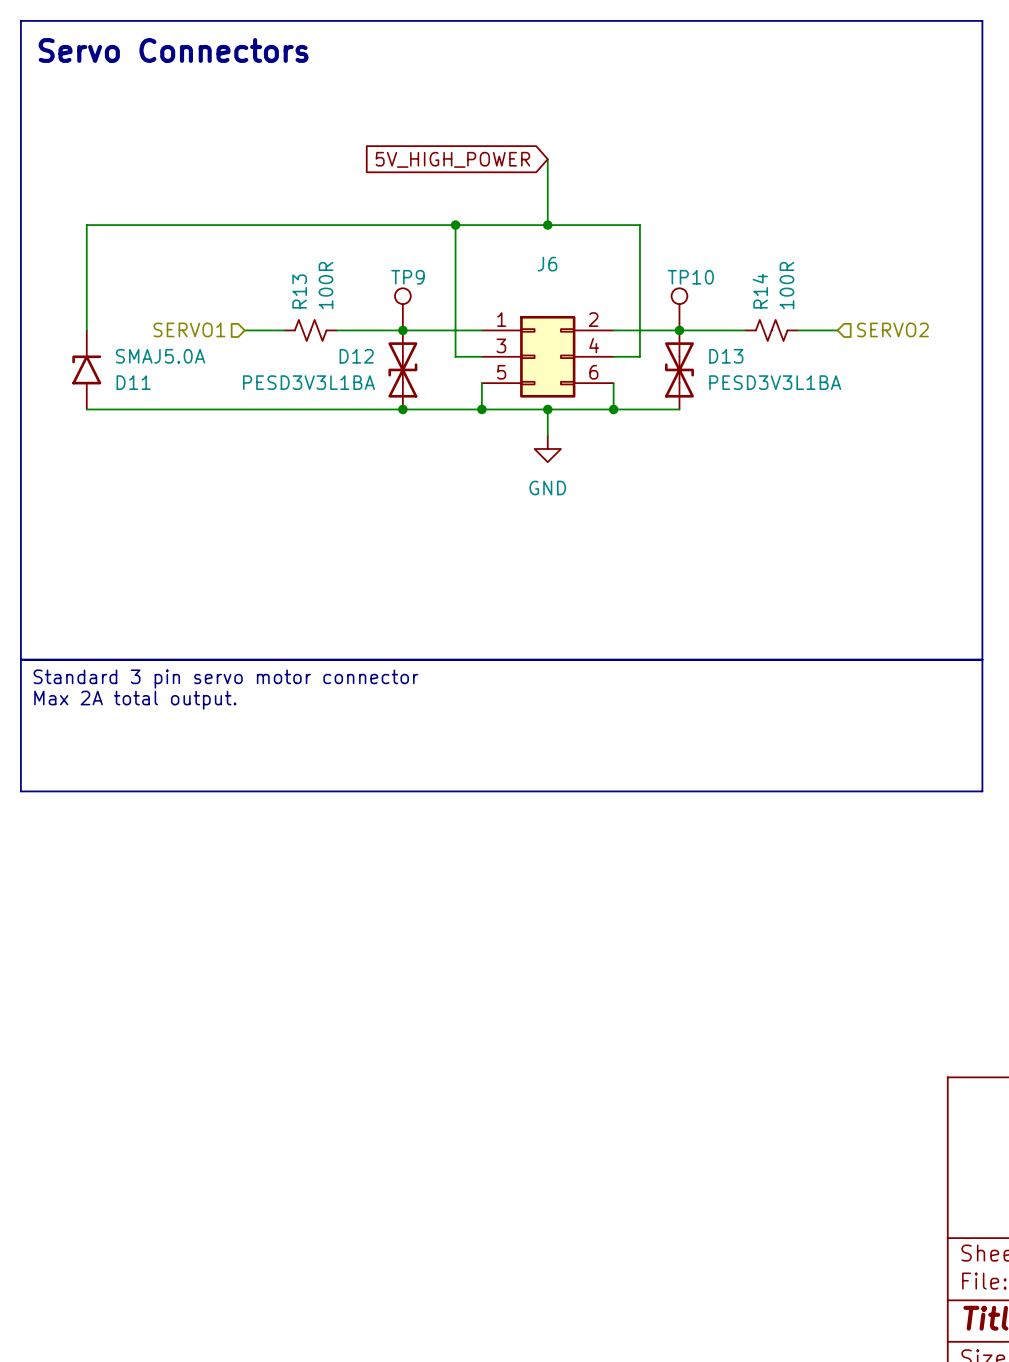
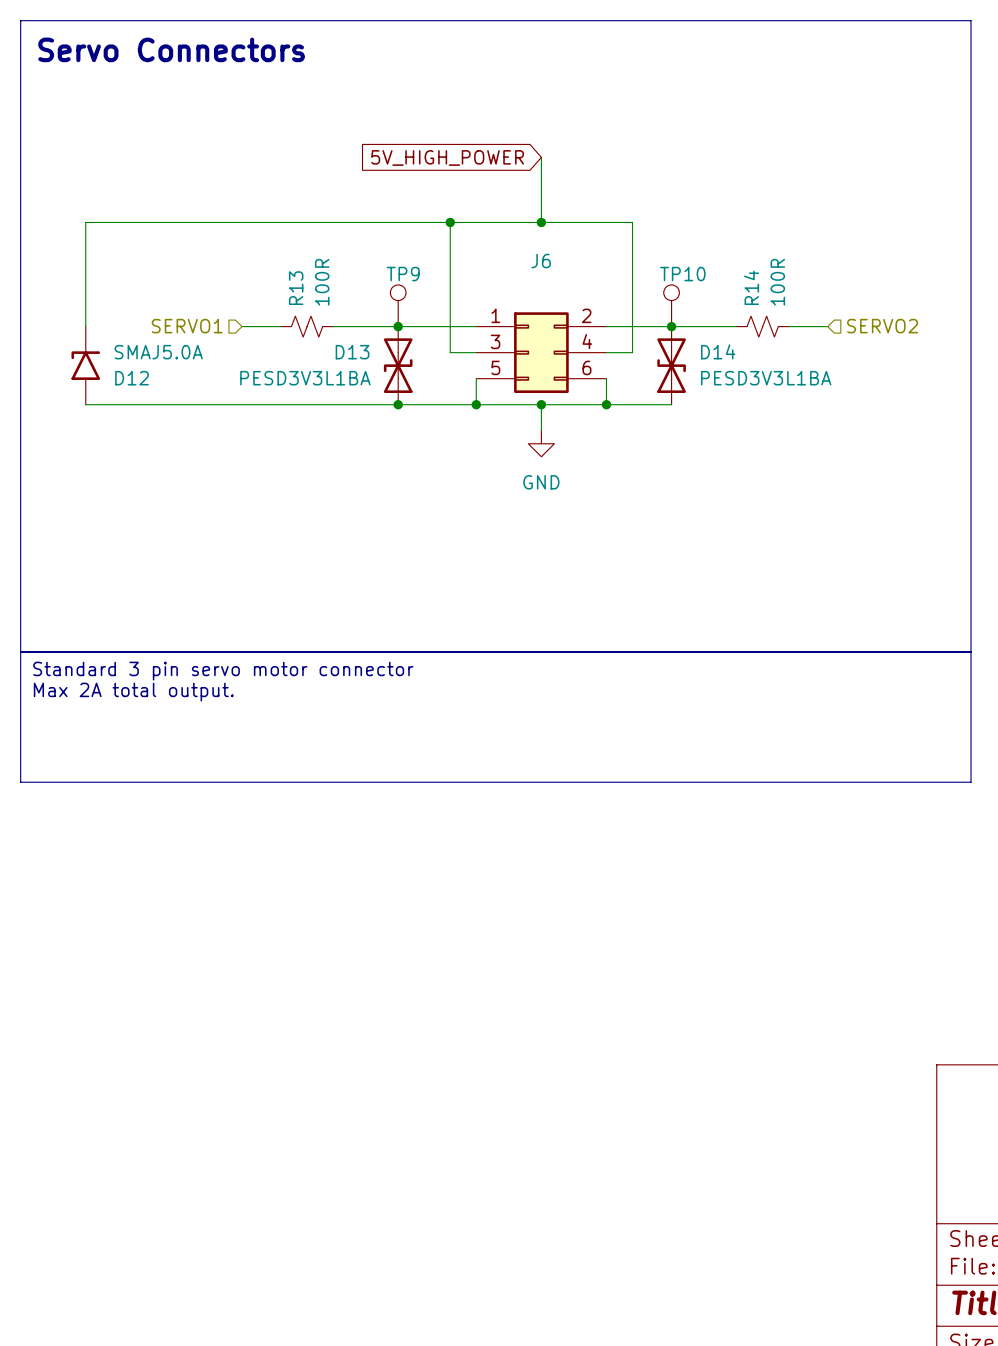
D12 name: D12 (356, 356) -> D13 (352, 352)
D13 name: D13 (726, 356) -> D14 (718, 351)
D11 name: D11 (133, 382) -> D12 (132, 378)

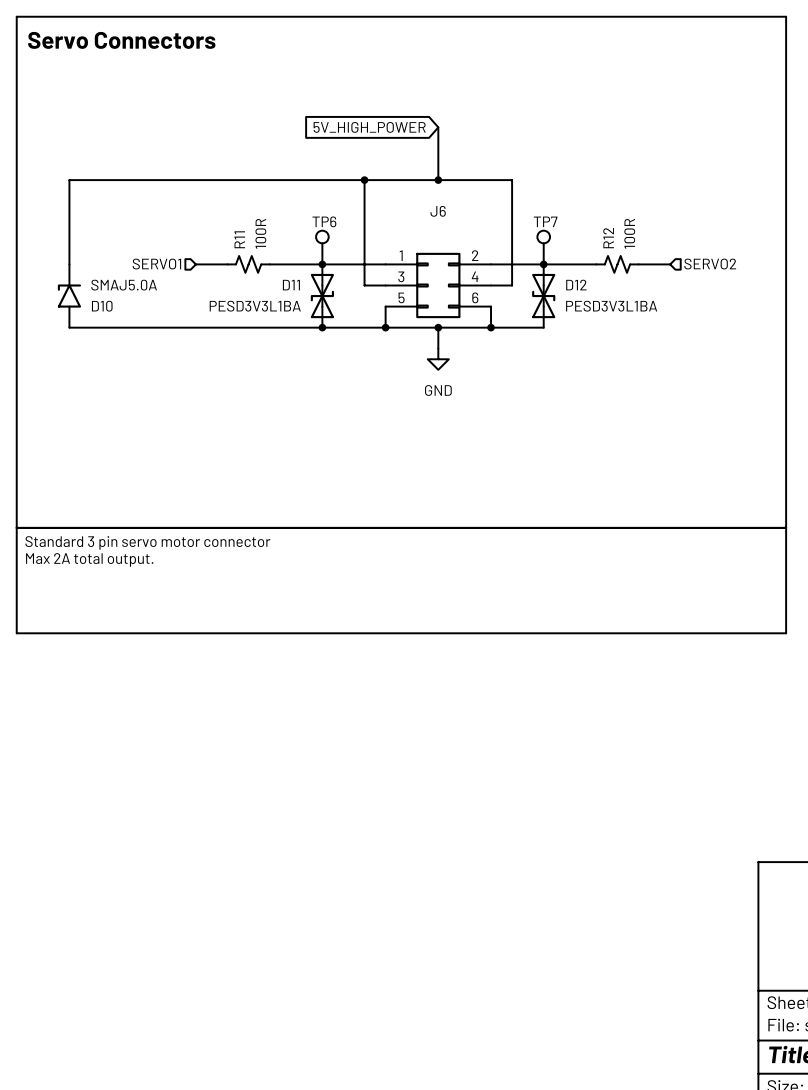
TP9 name: TP9 (403, 274) -> TP6 (324, 221)
TP10 name: TP10 (682, 274) -> TP7 (545, 221)
R14 name: R14 (751, 287) -> R12 (608, 238)
R13 name: R13 (296, 288) -> R11 (239, 239)
D14 name: D14 (718, 351) -> D12 (576, 285)
D13 name: D13 (352, 352) -> D11 (291, 285)
D12 name: D12 (132, 378) -> D10 (102, 306)

